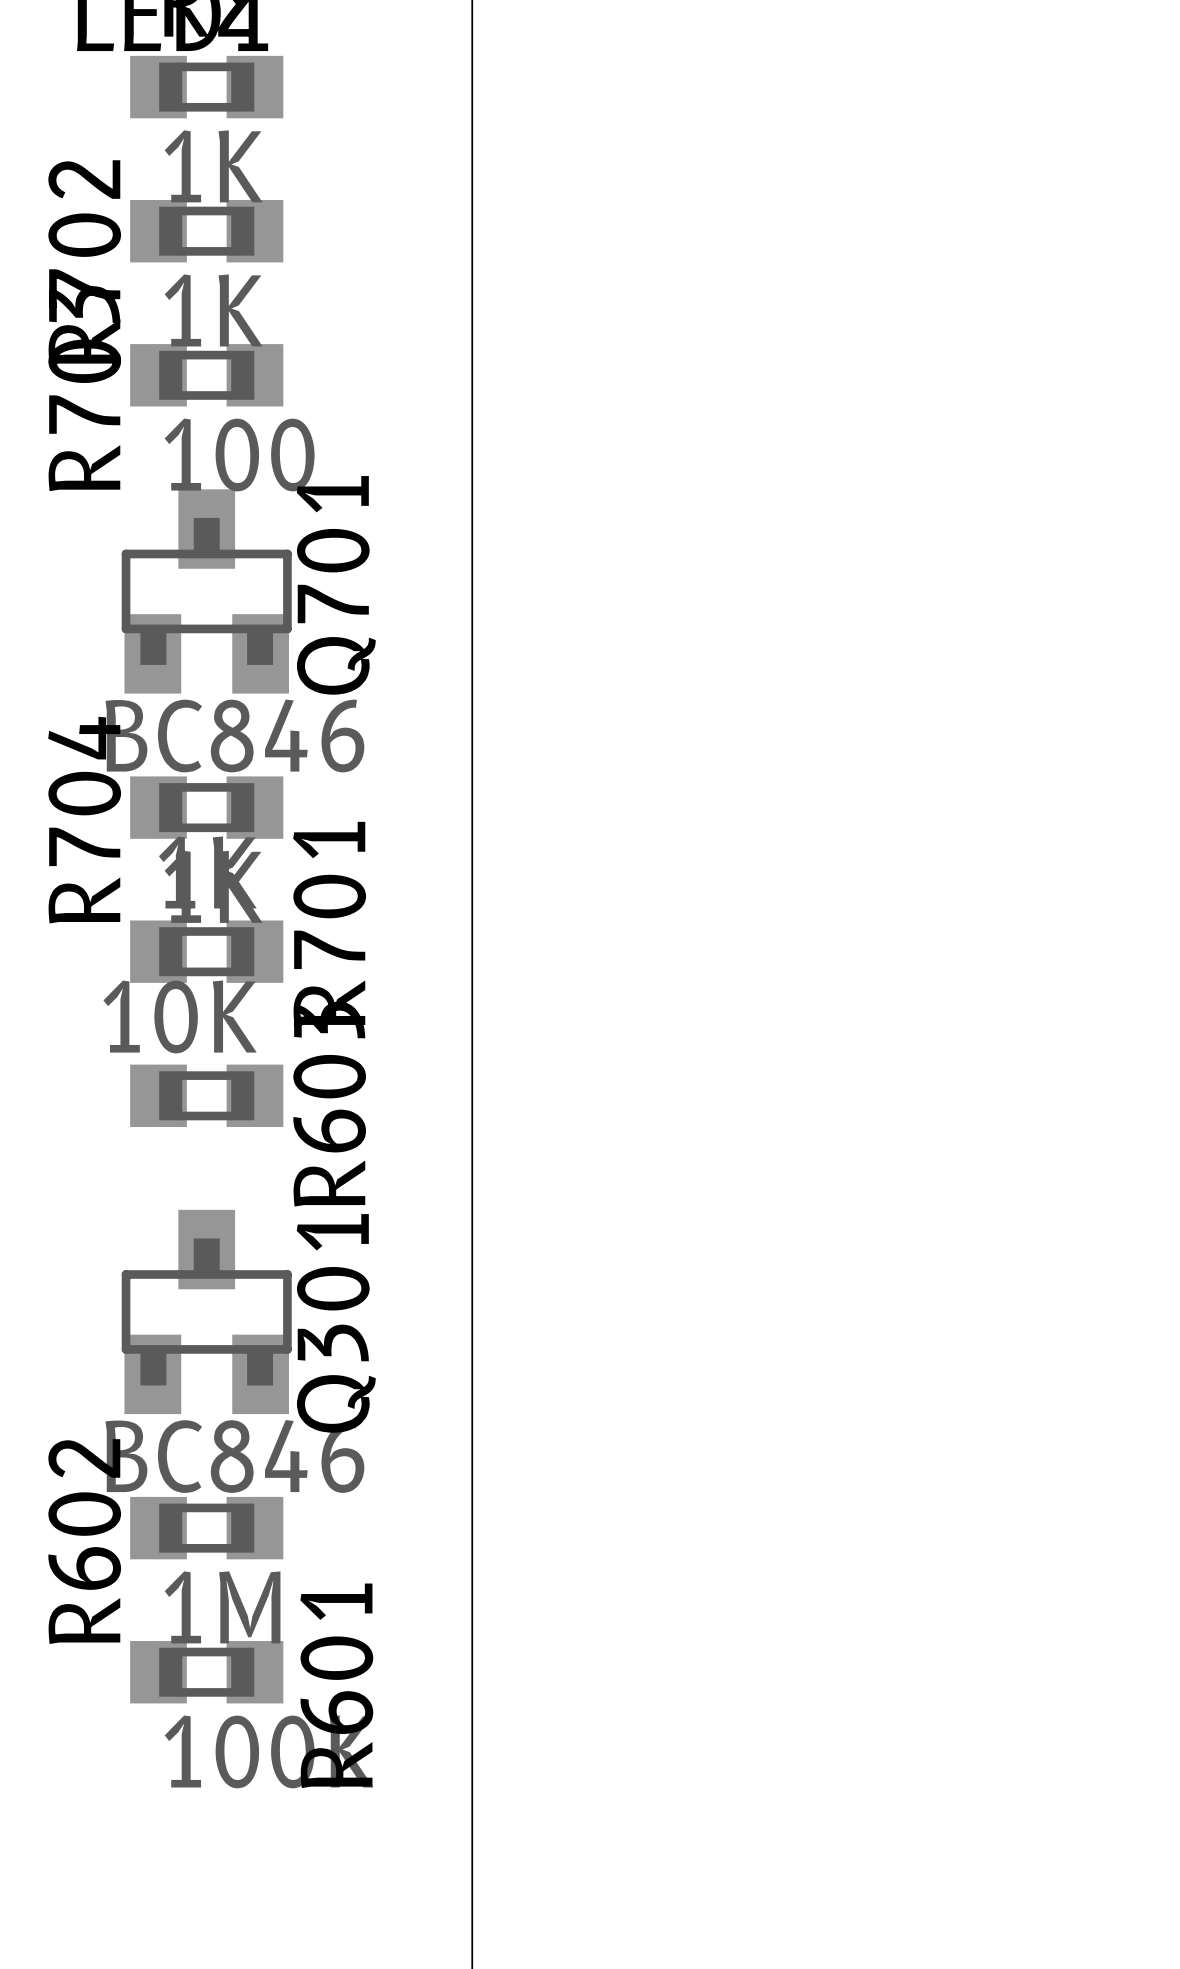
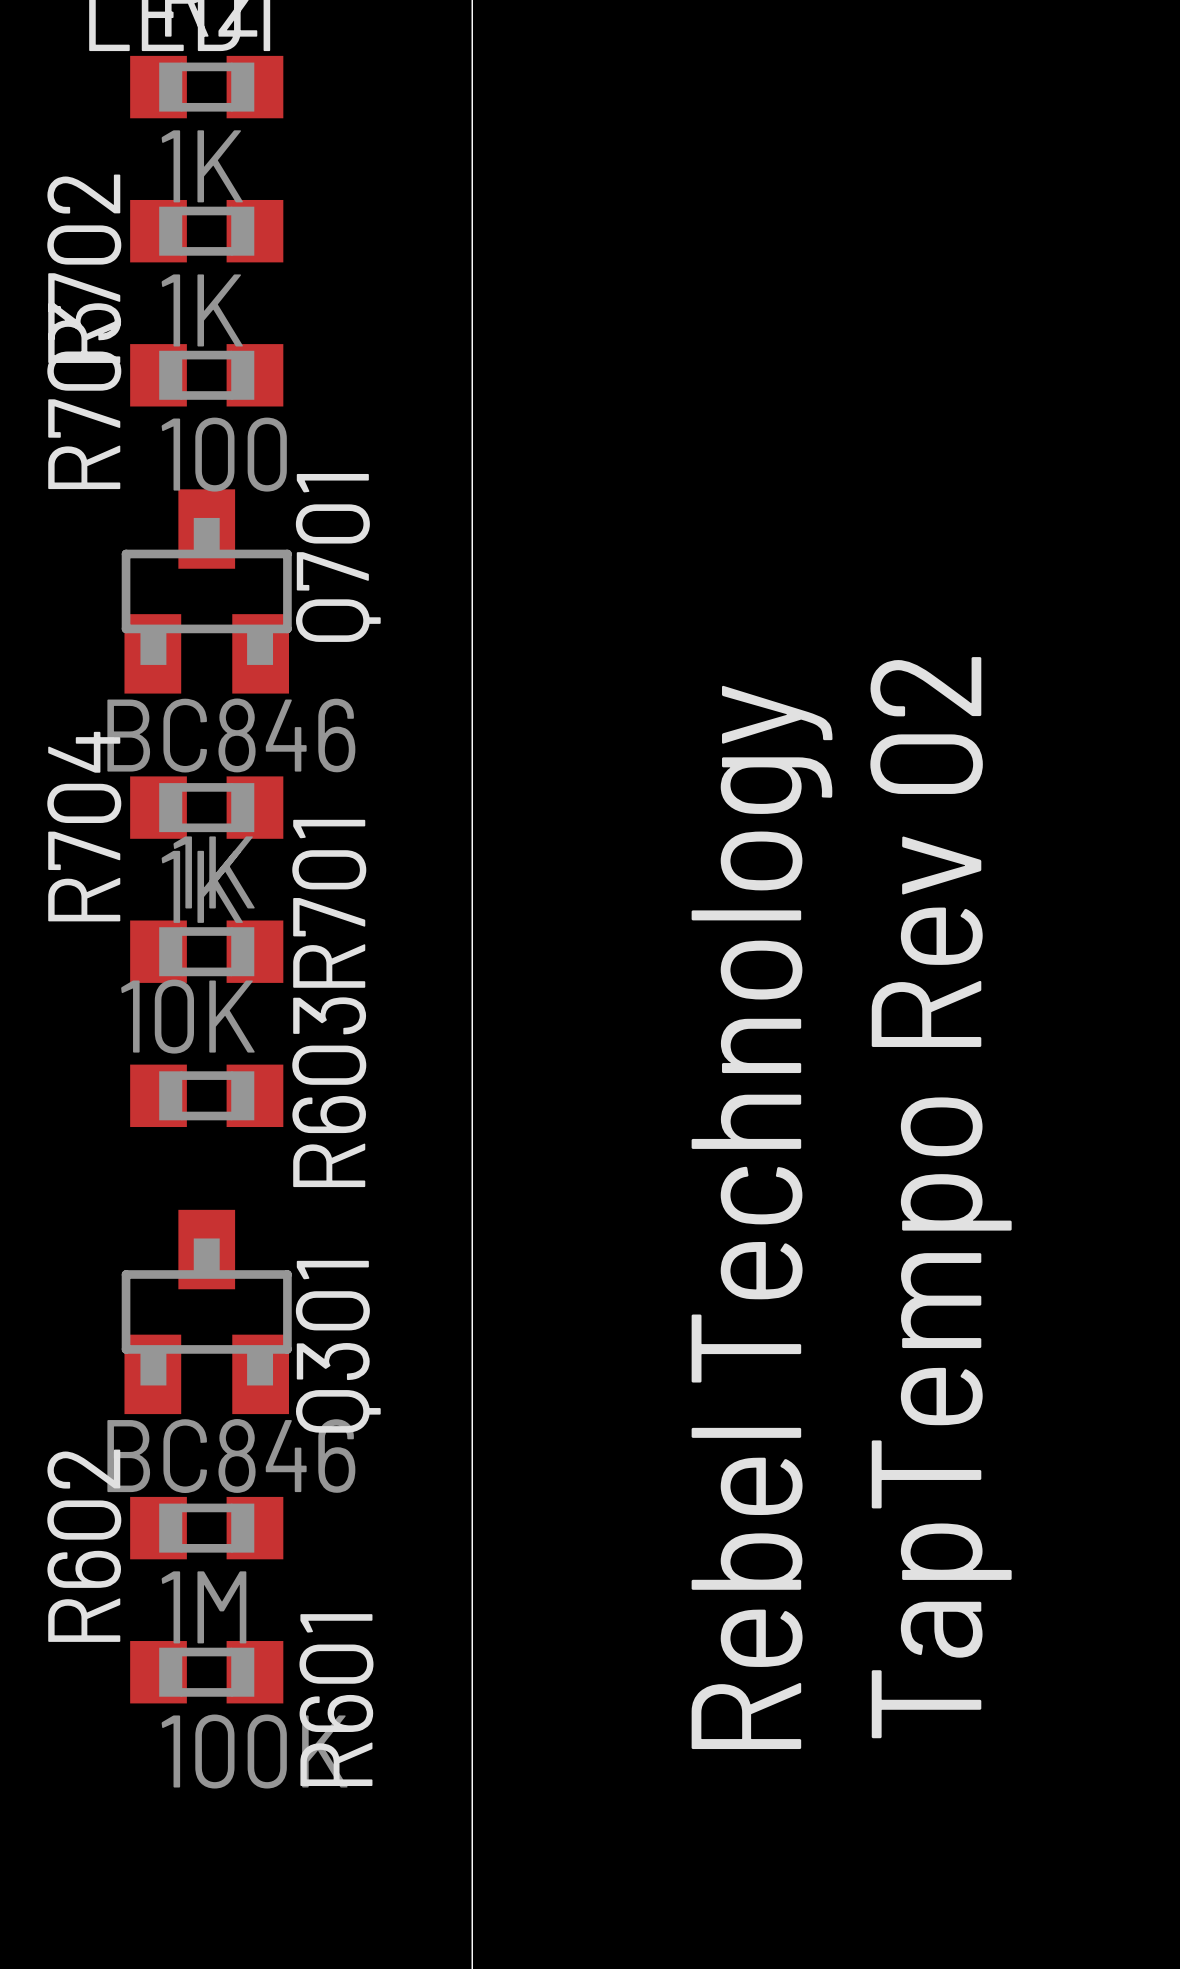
text: none -> TapTempo Rev 02 (941, 1197)
text: none -> Rebel Technology (762, 1217)

